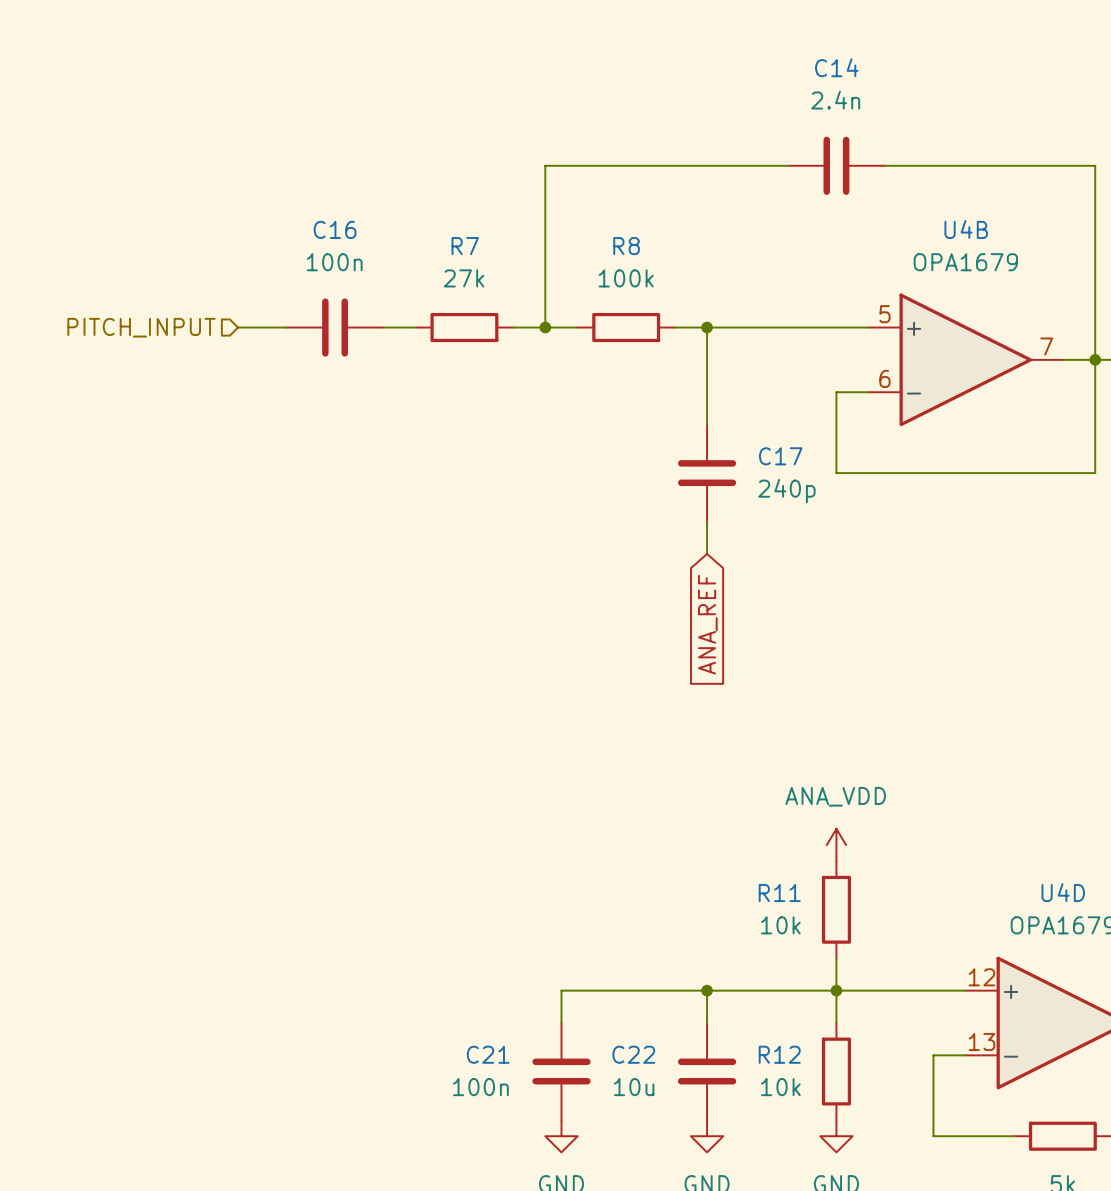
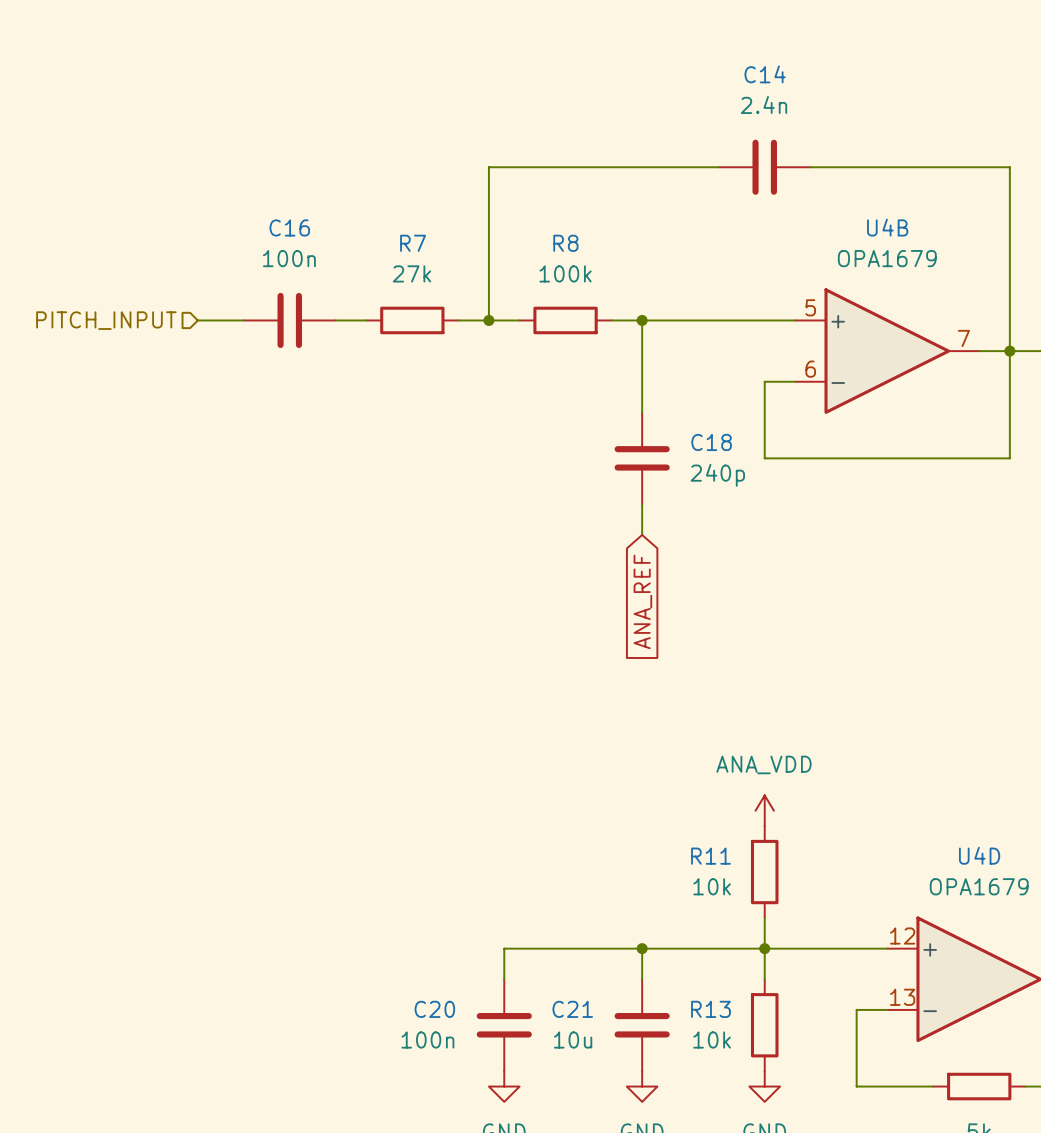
C17 name: C17 (780, 456) -> C18 (711, 442)
C21 name: C21 (488, 1054) -> C20 (434, 1009)
C22 name: C22 (633, 1054) -> C21 (572, 1009)
R12 name: R12 (779, 1054) -> R13 (710, 1009)

